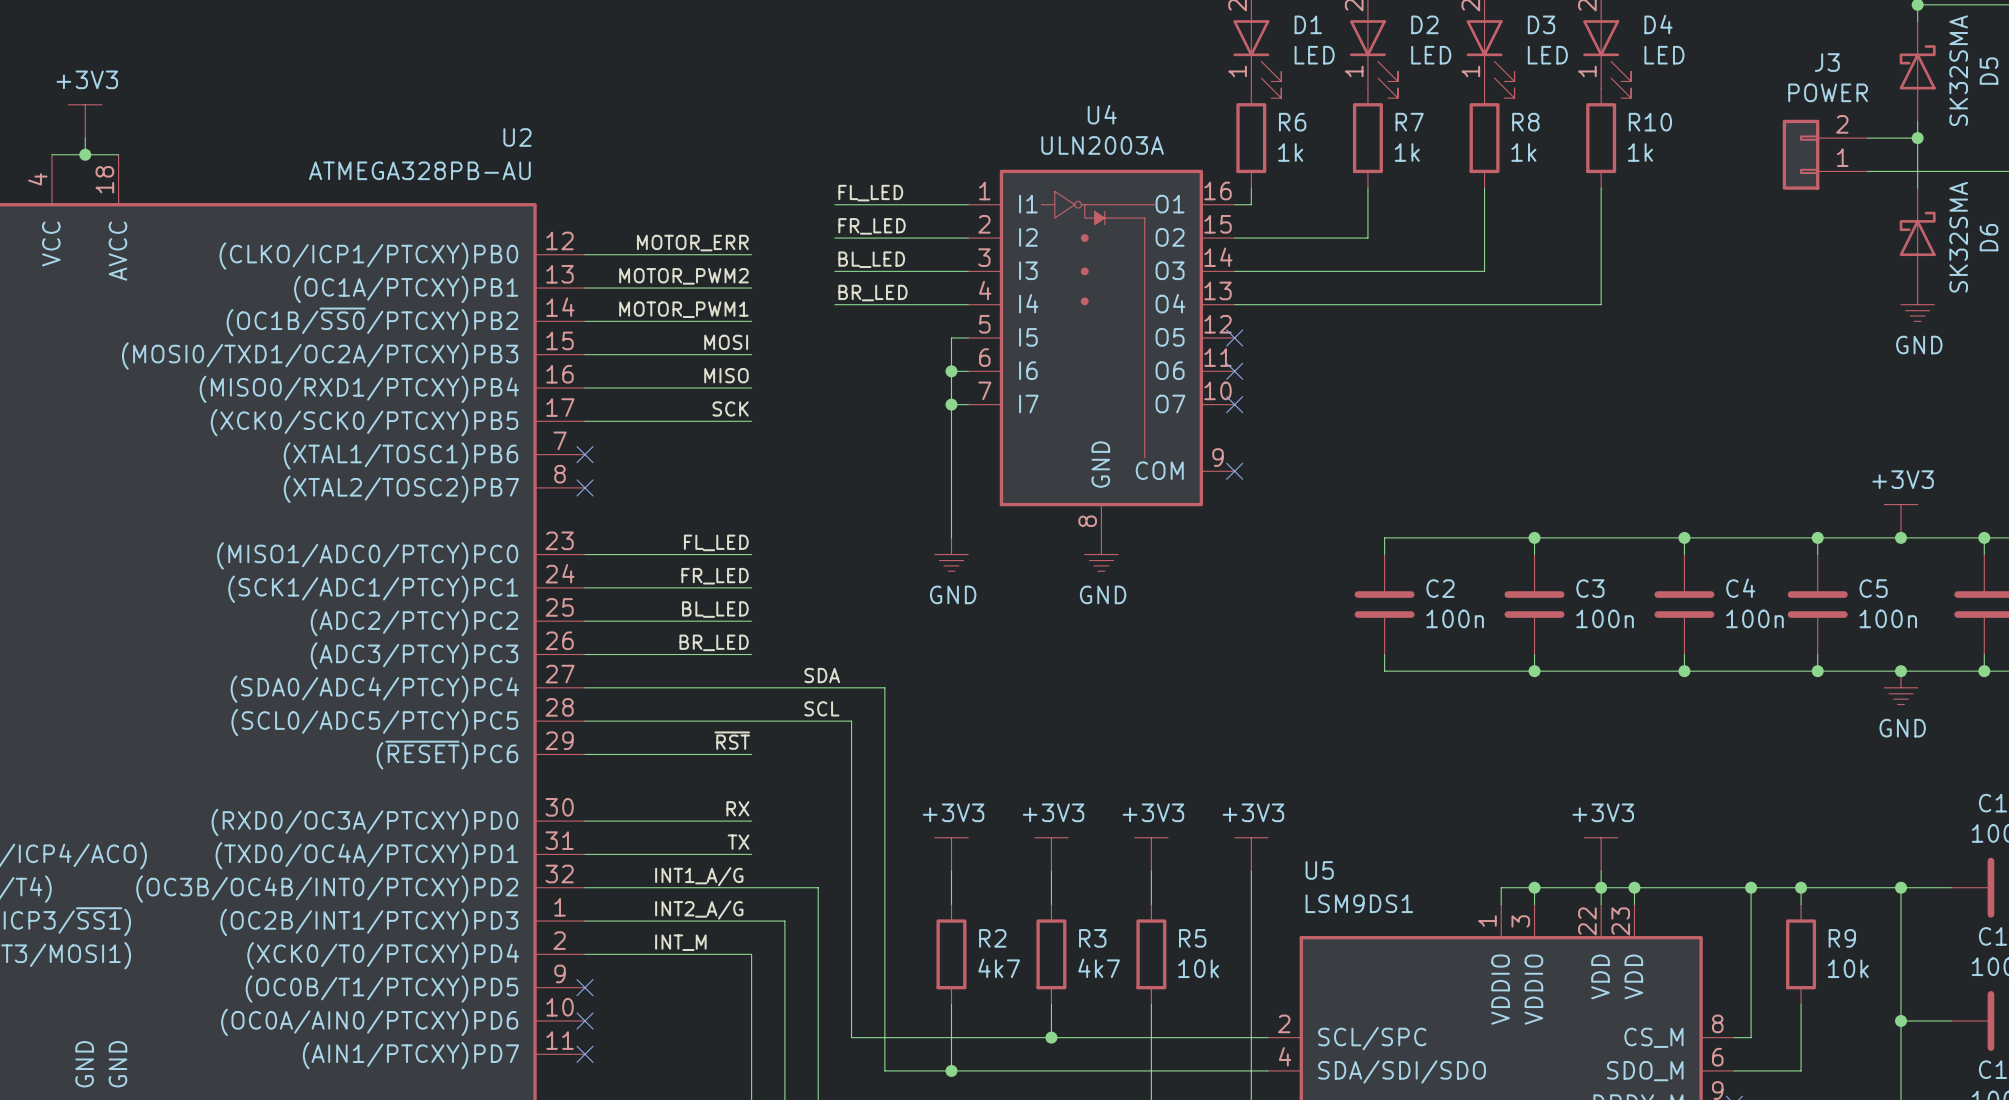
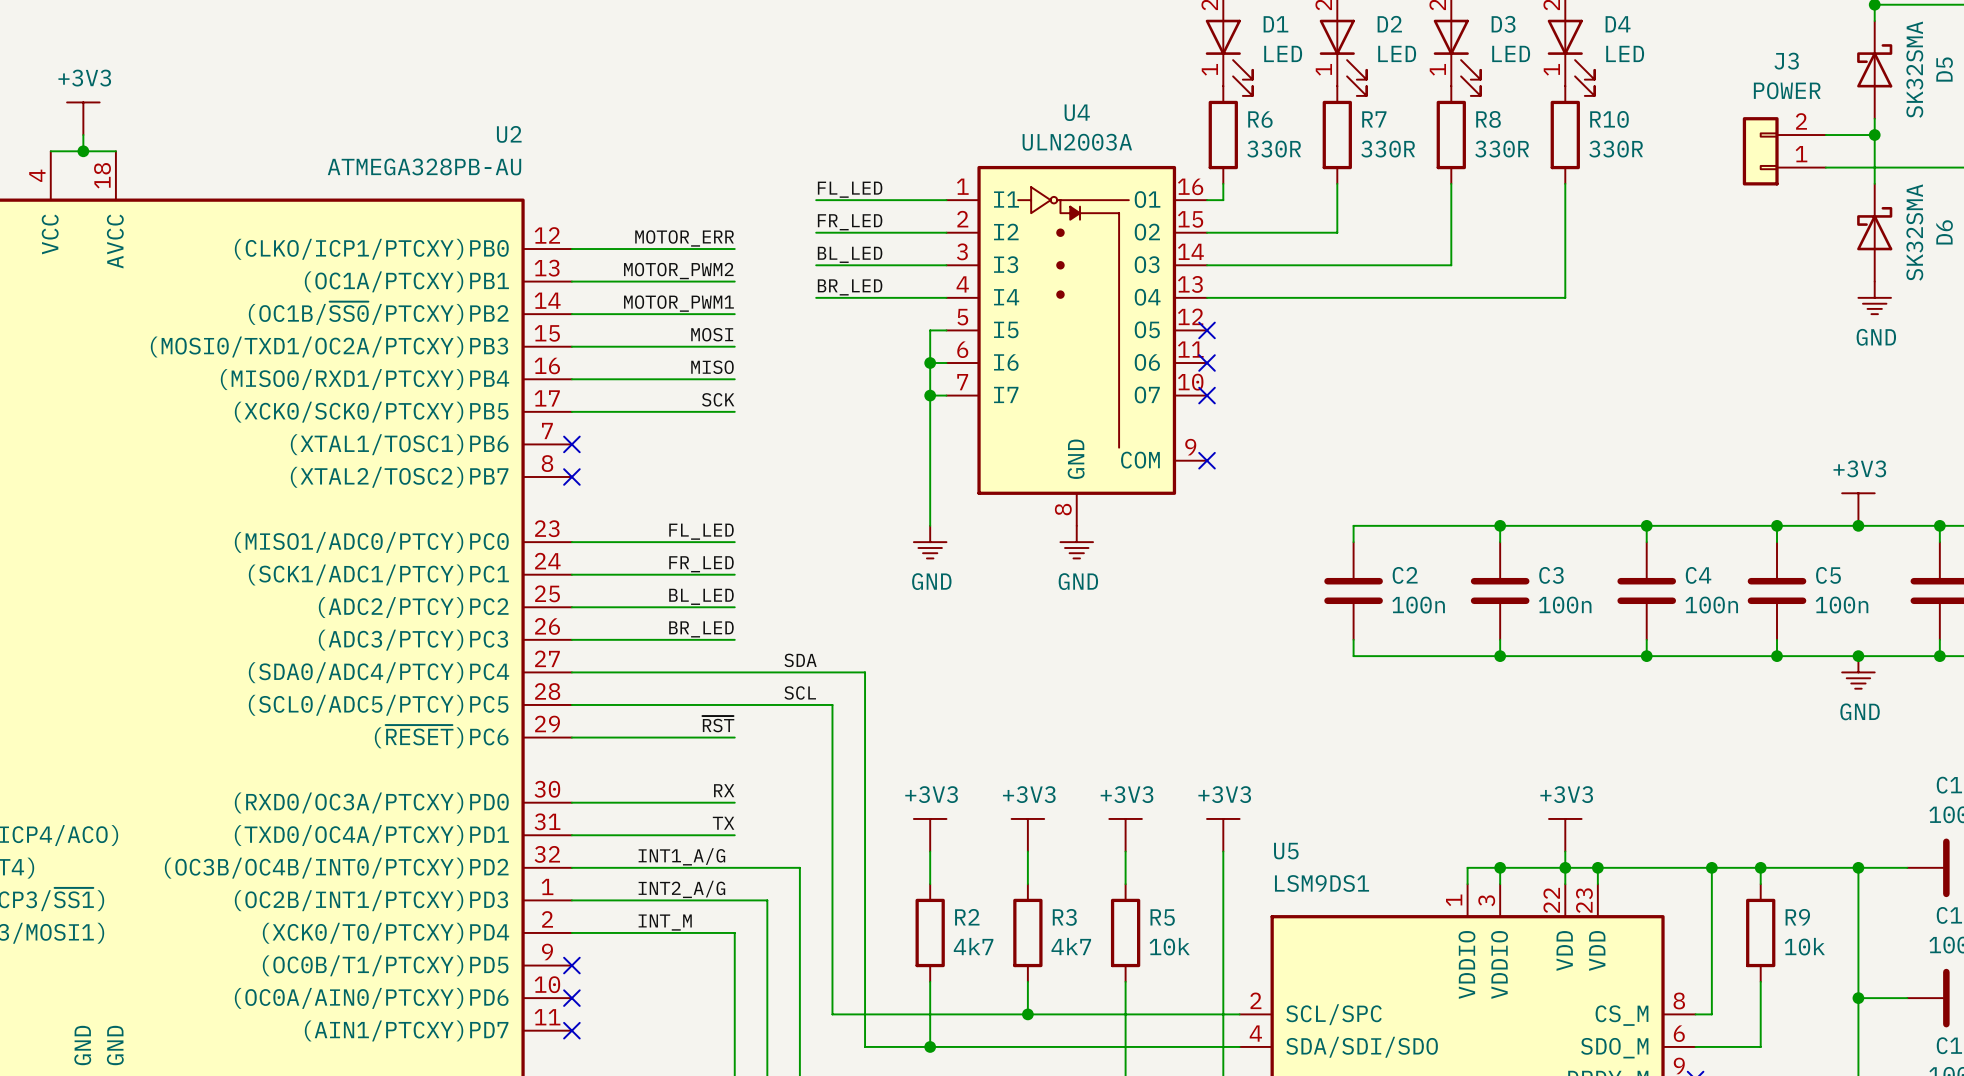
R6 value: 1k (1290, 152) -> 330R (1274, 149)
R7 value: 1k (1407, 152) -> 330R (1388, 149)
R8 value: 1k (1523, 152) -> 330R (1502, 149)
R10 value: 1k (1640, 152) -> 330R (1616, 149)

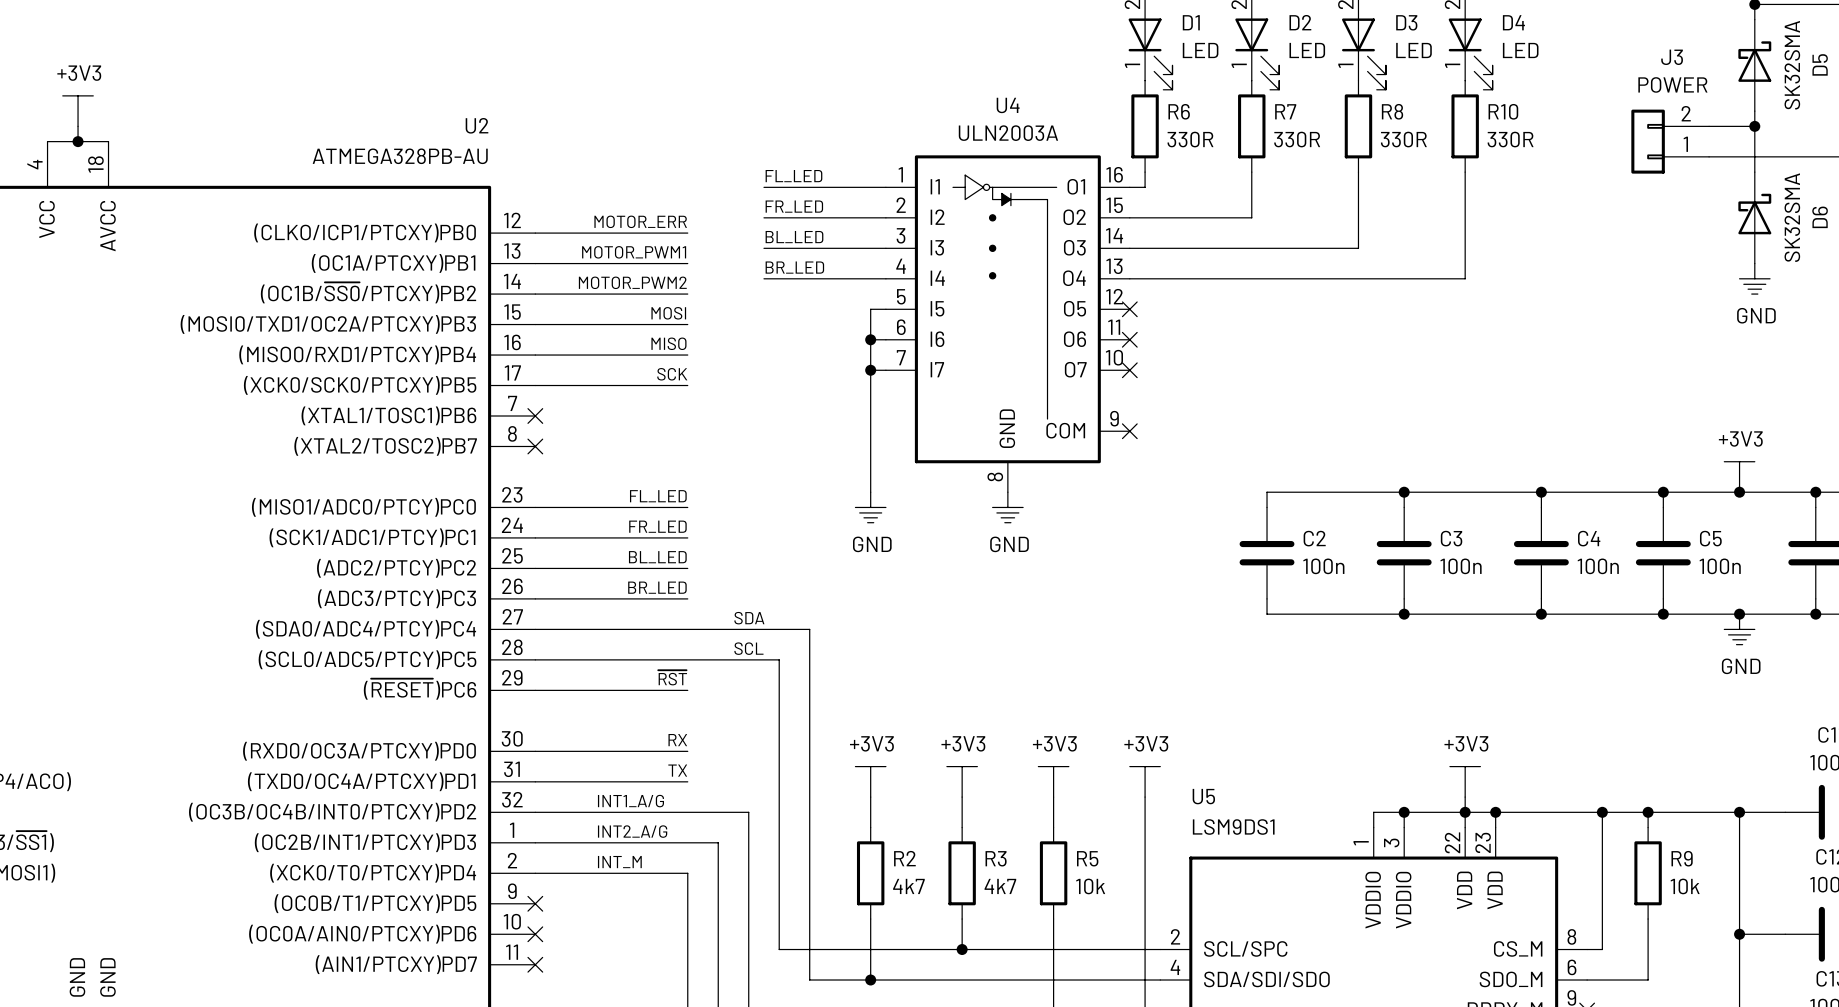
label: MOTOR_PWM2 (678, 271) -> MOTOR_PWM1 (634, 252)
label: MOTOR_PWM1 (678, 303) -> MOTOR_PWM2 (632, 282)

